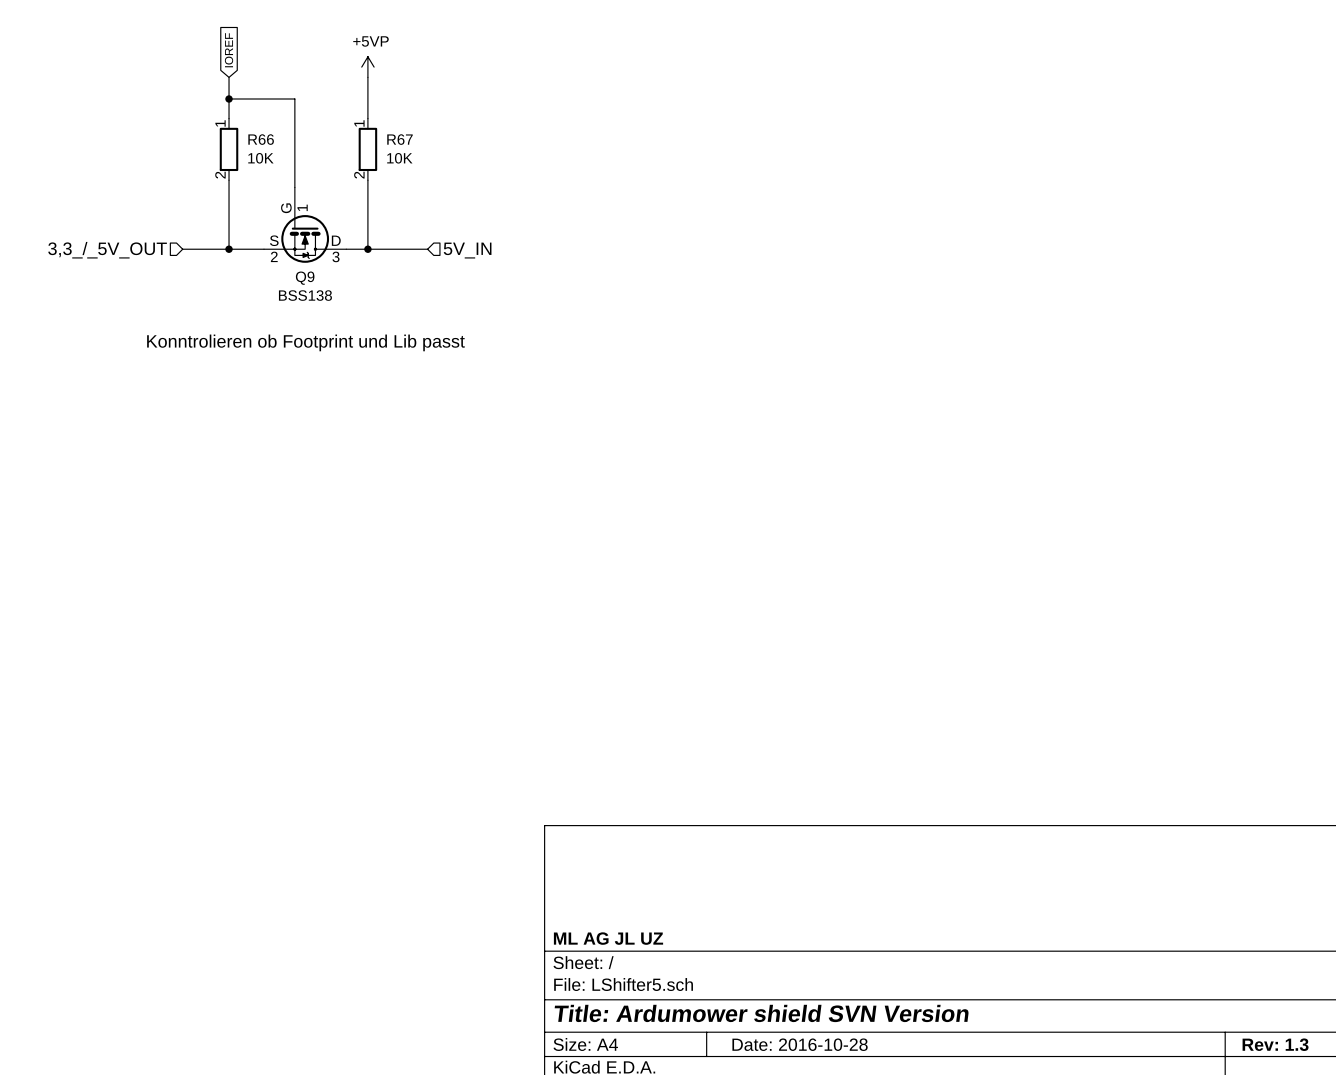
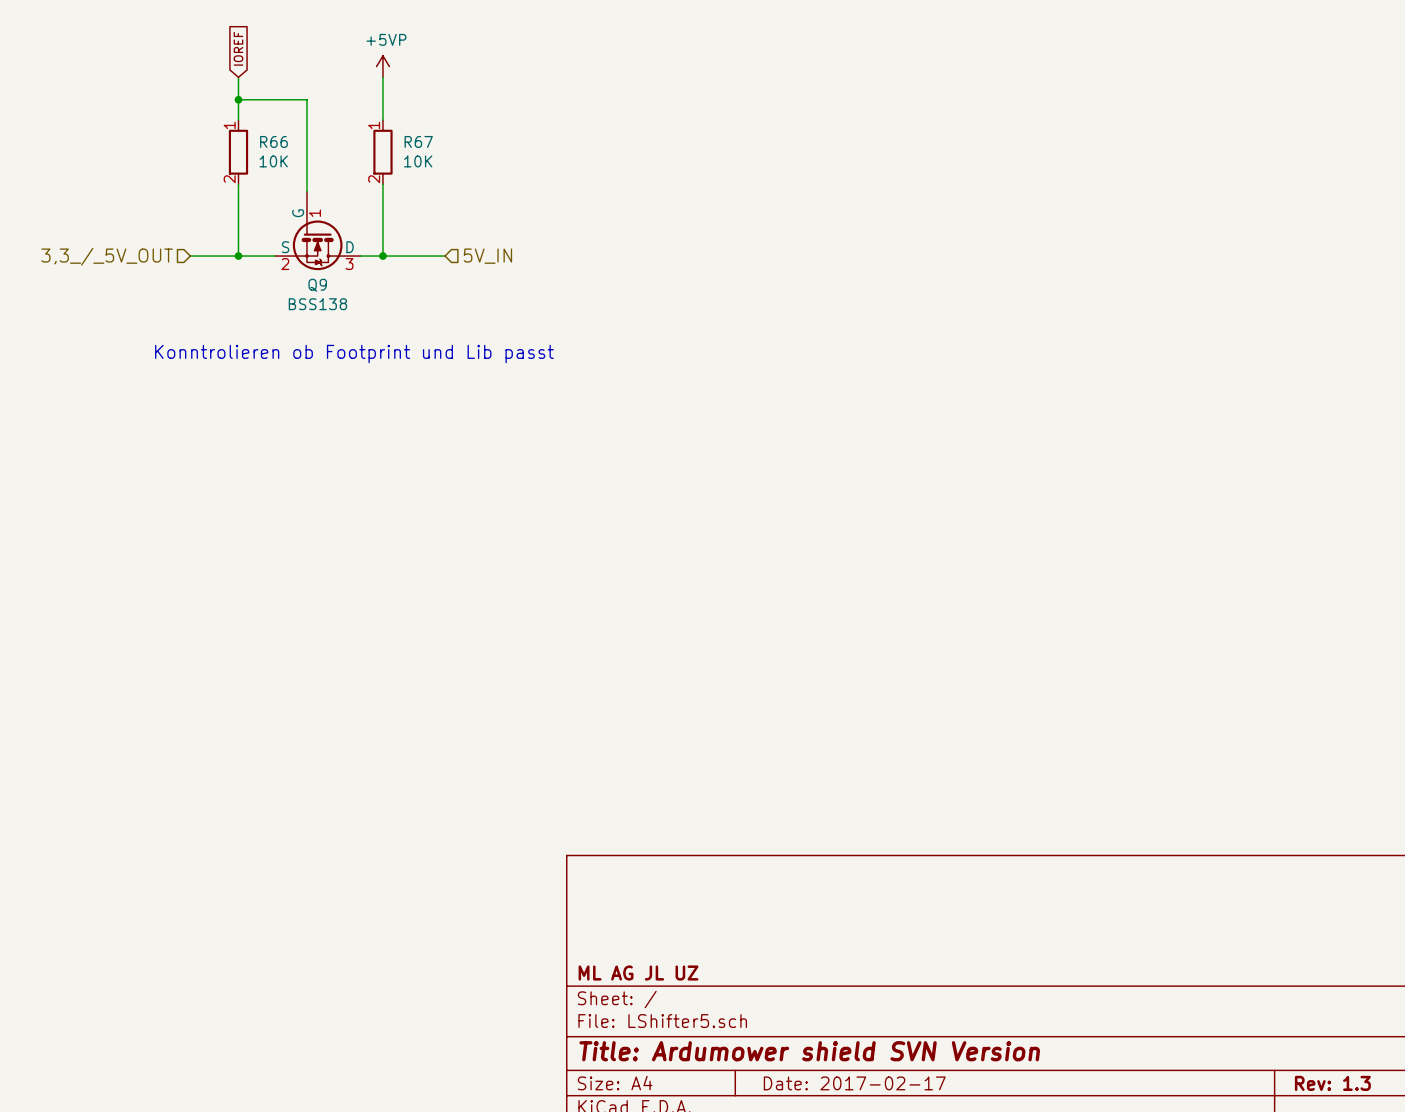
title block: Date: 2016-10-28 (800, 1044) -> Date: 2017-02-17 (854, 1083)

